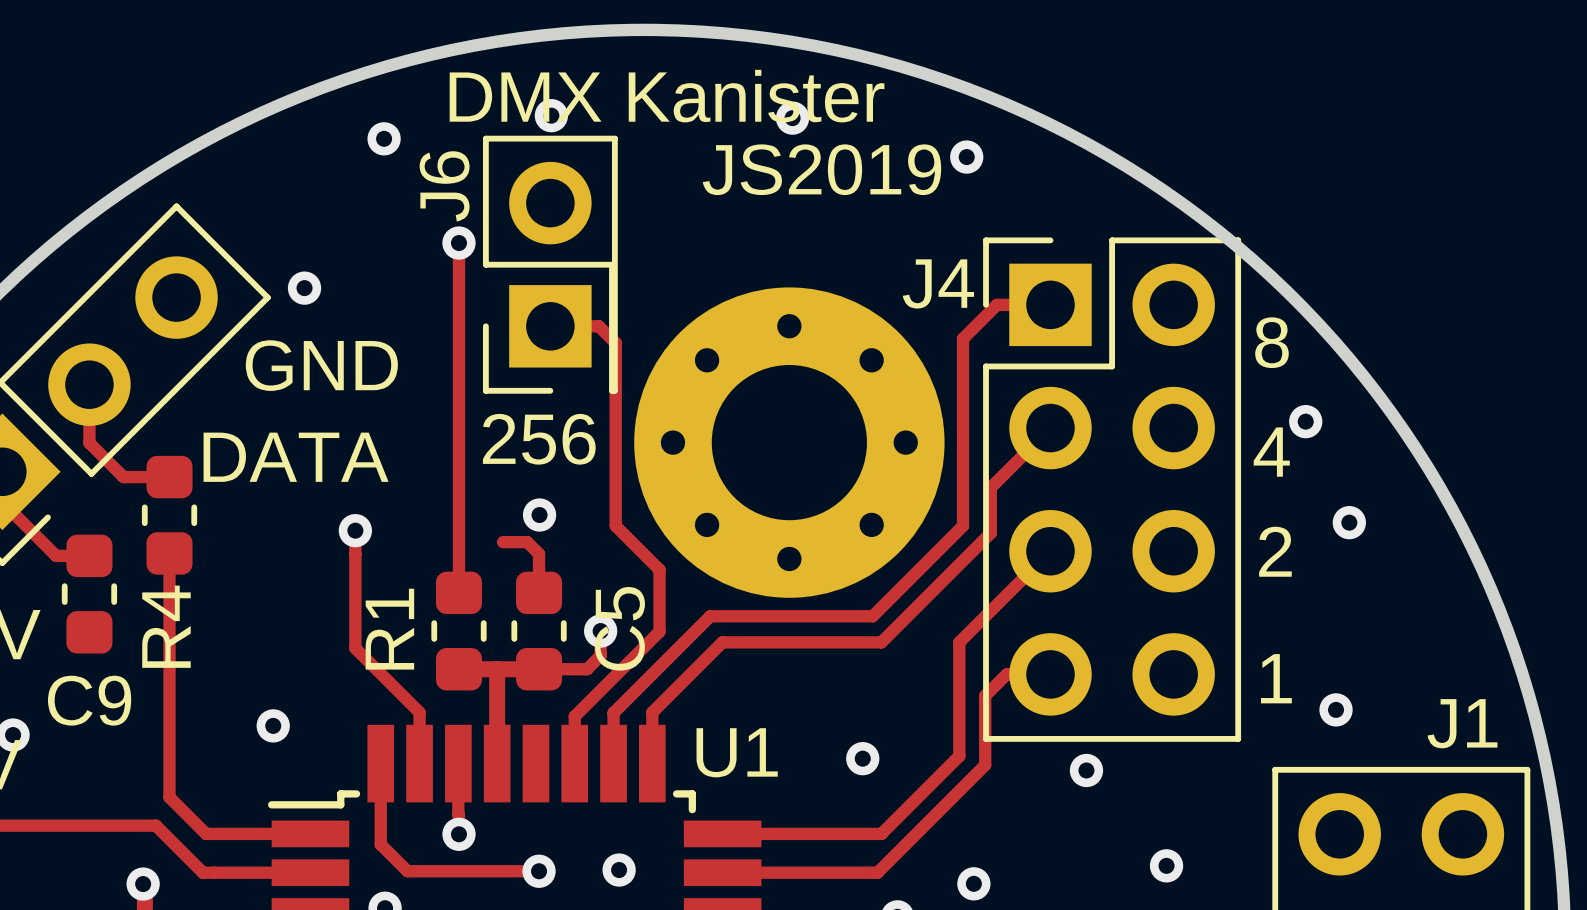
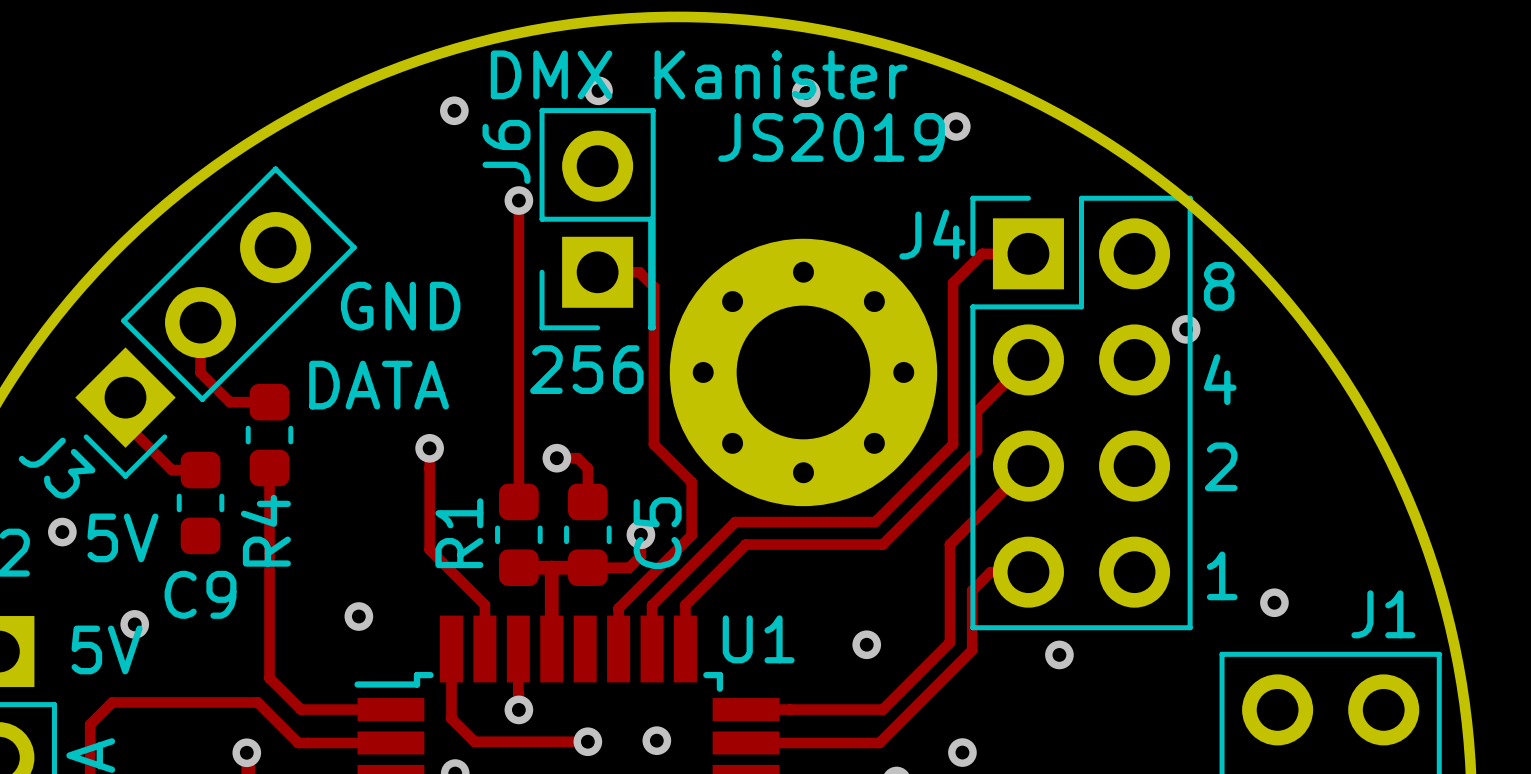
via: (304, 288) -> none
via position: (1305, 421) -> (1186, 329)
via position: (539, 515) -> (556, 458)
via: (1349, 522) -> none
via: (1166, 865) -> none

